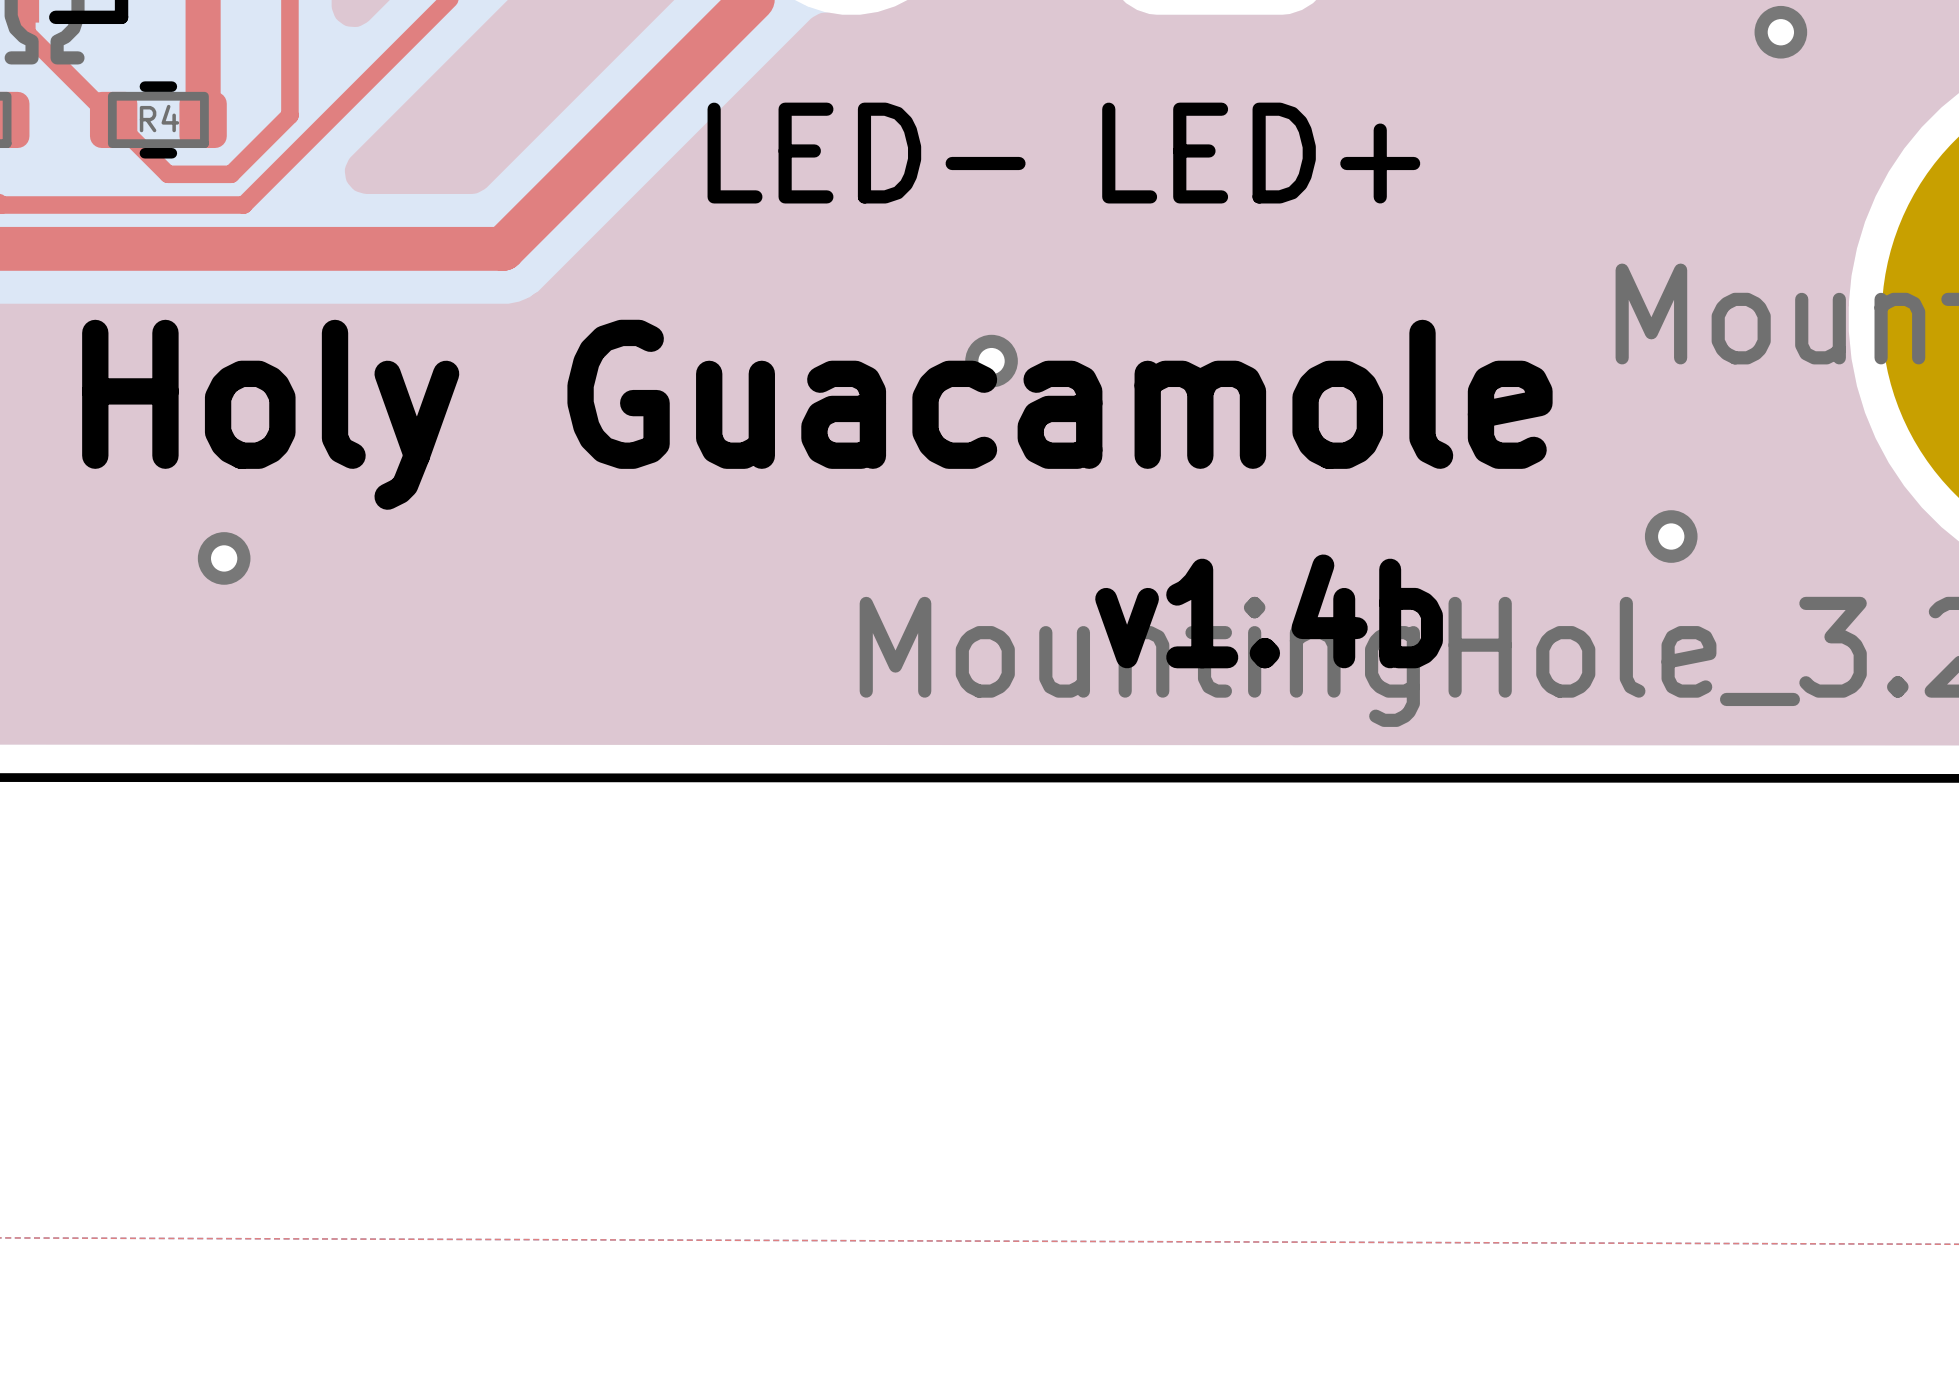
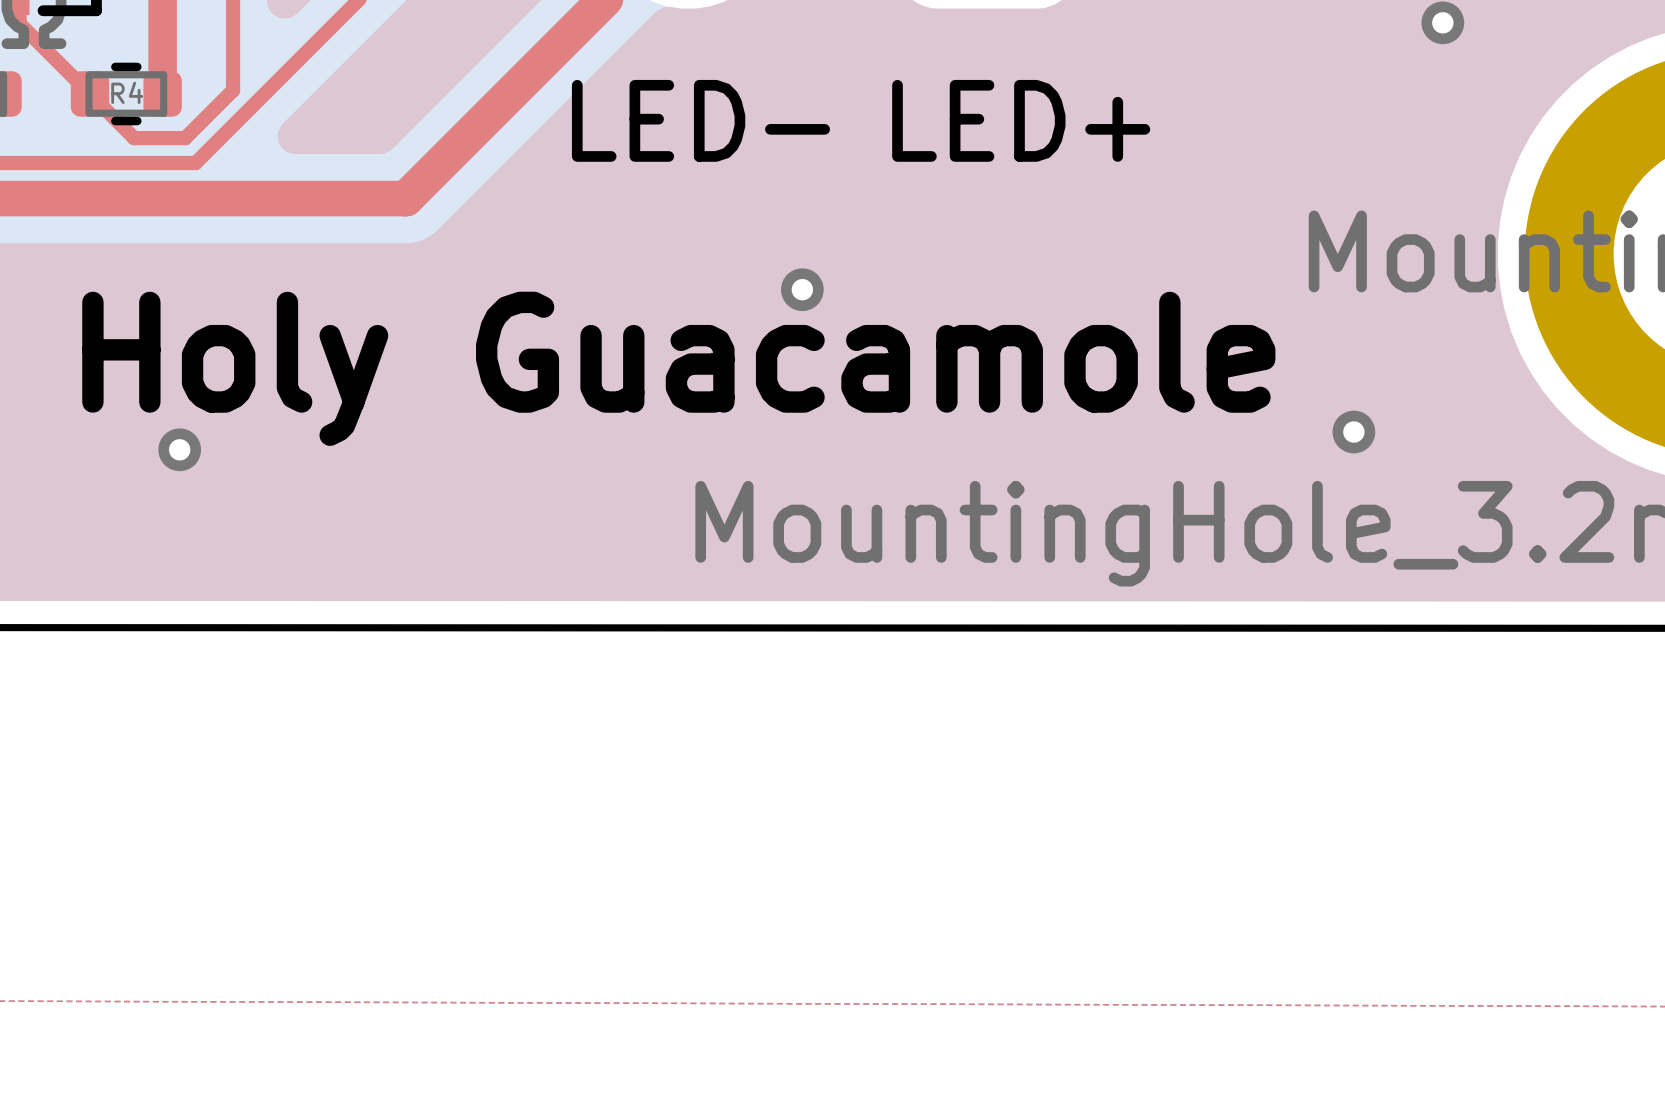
text position: Holy Guacamole (817, 414) -> Holy Guacamole (678, 368)
text: v1.4b (1269, 611) -> none

